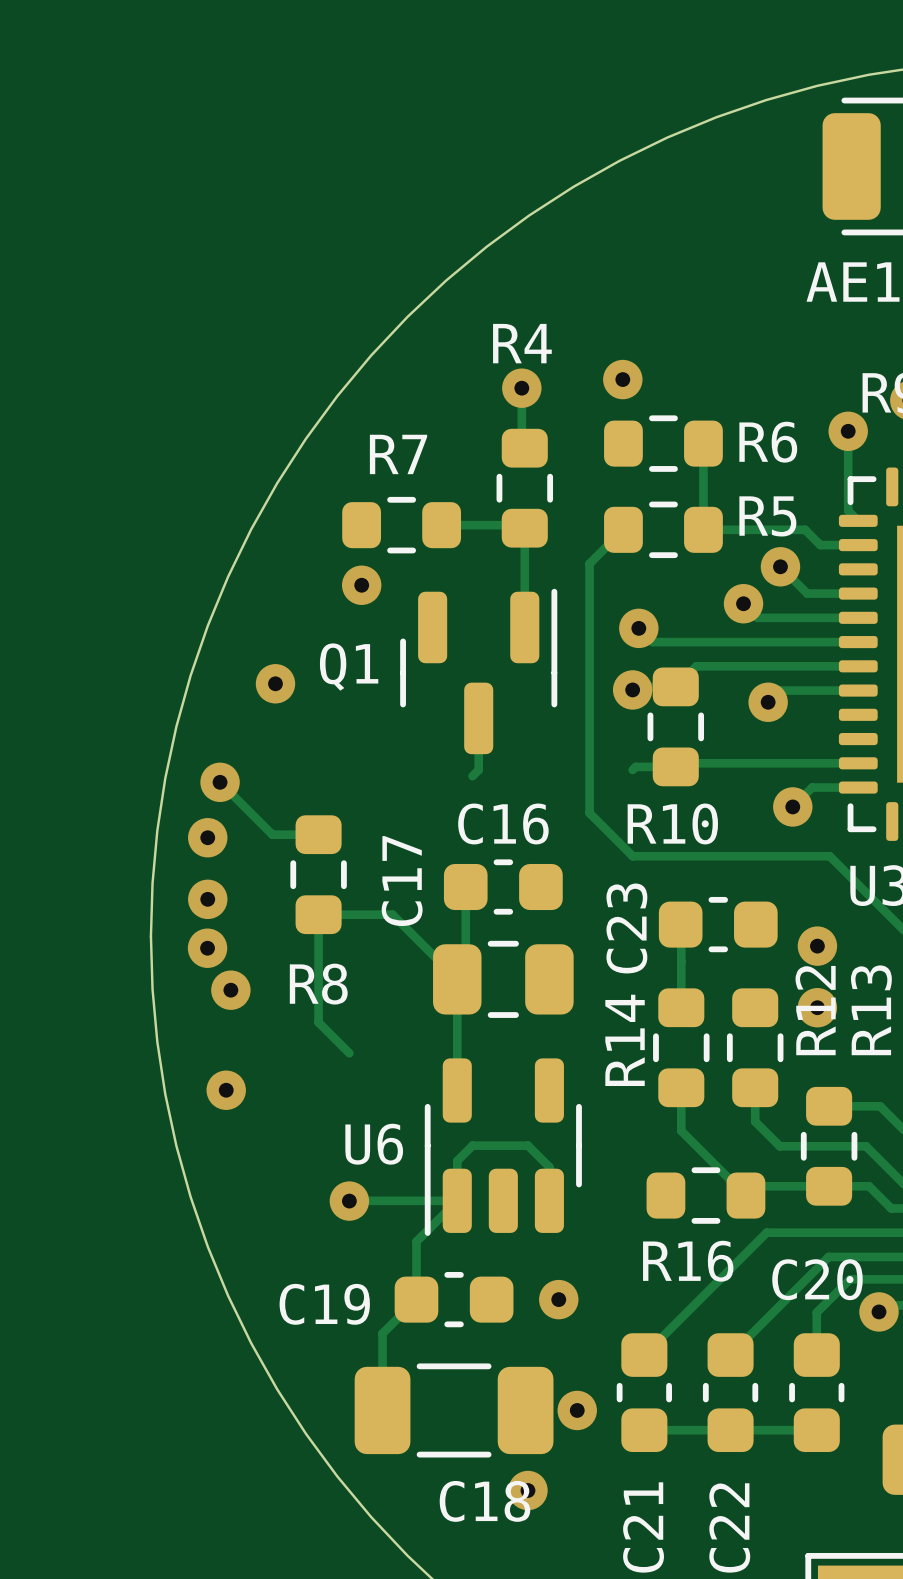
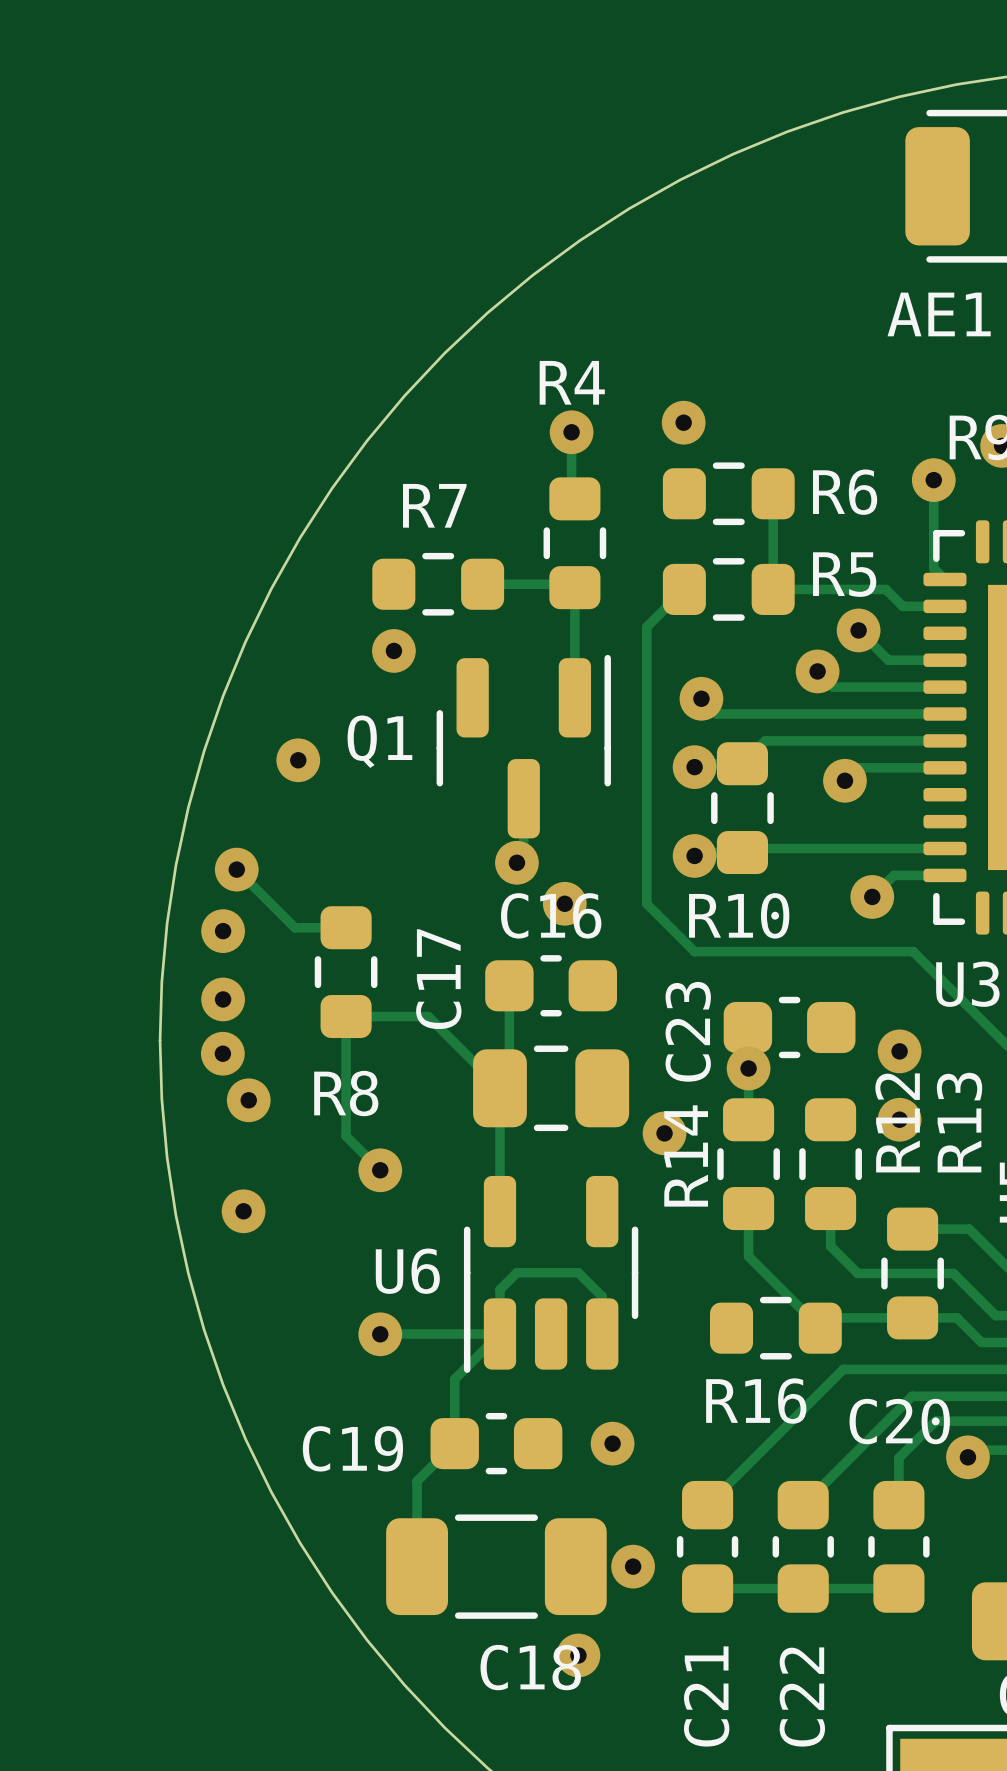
via: none -> (694, 855)
via: none -> (516, 862)
via: none -> (564, 903)
via: none -> (748, 1068)
via: none -> (664, 1133)
via: none -> (380, 1170)

